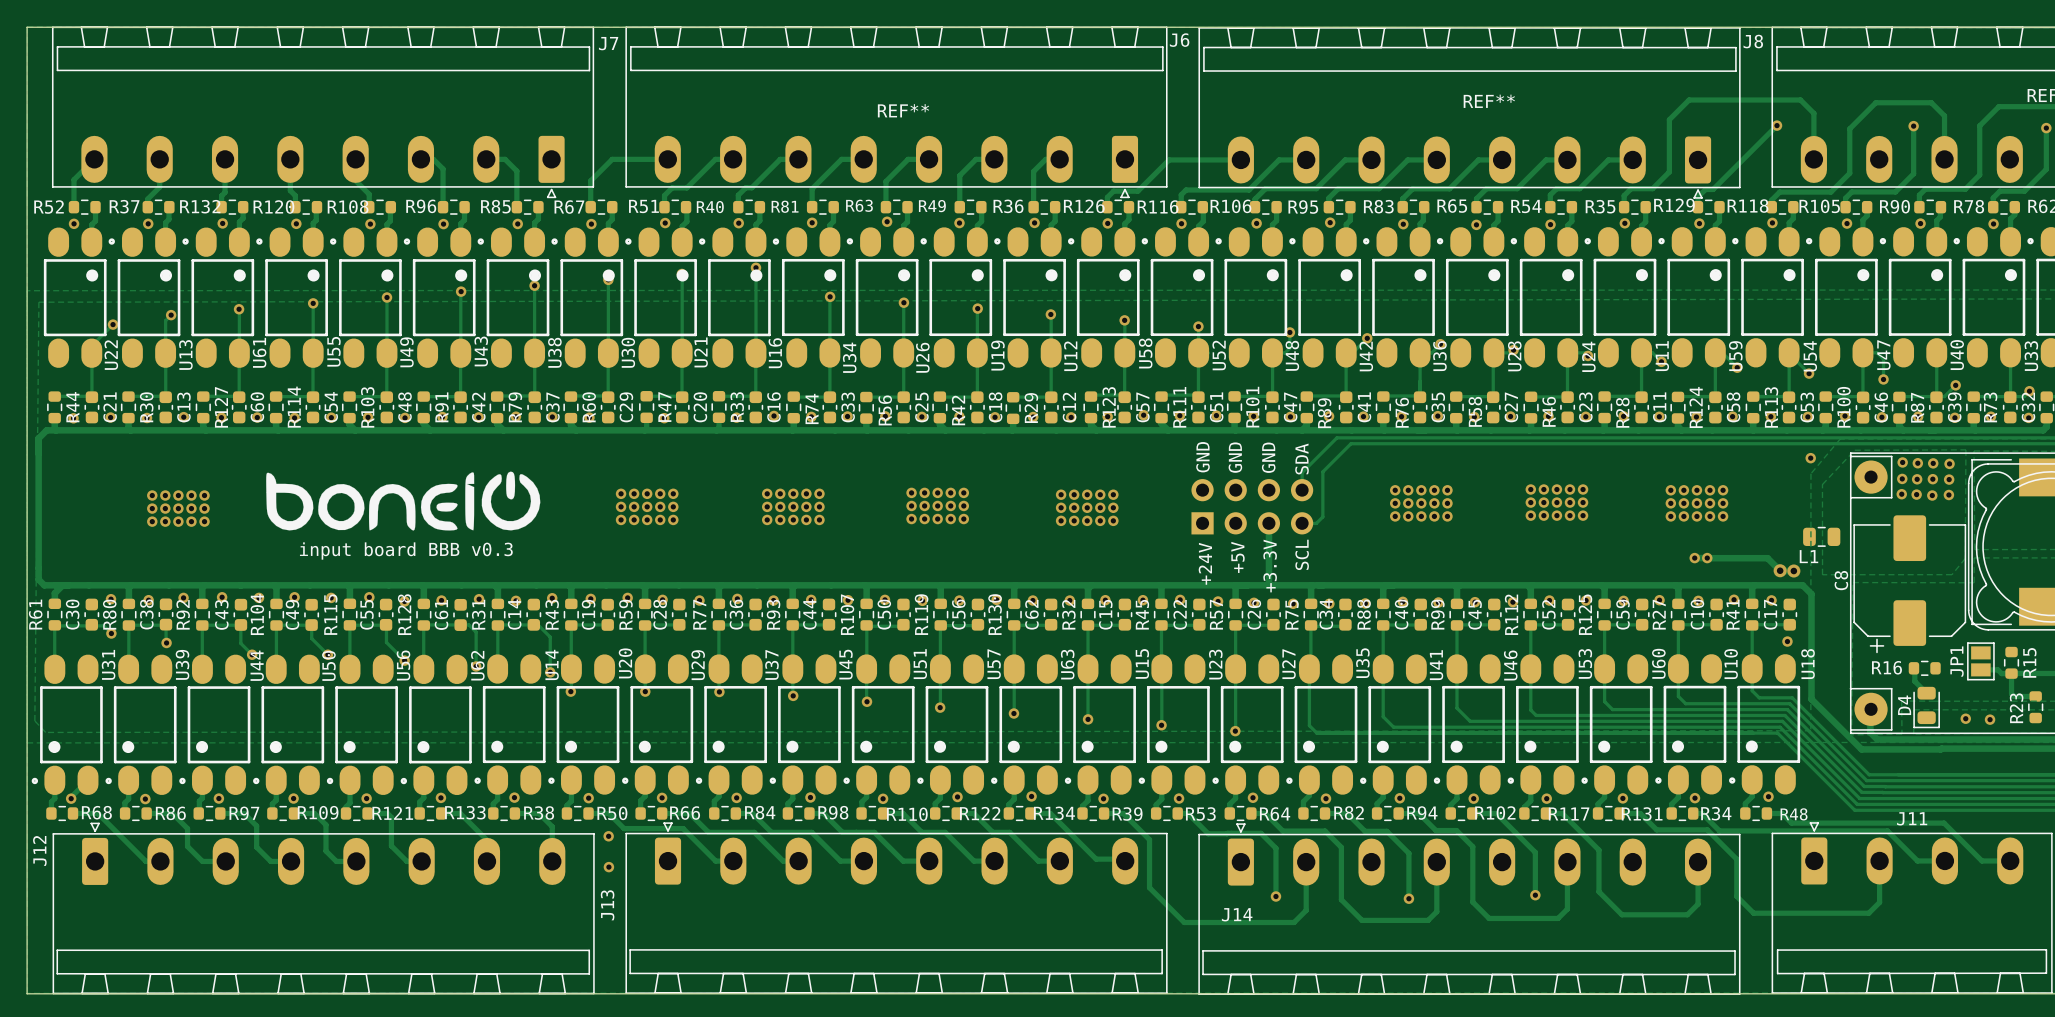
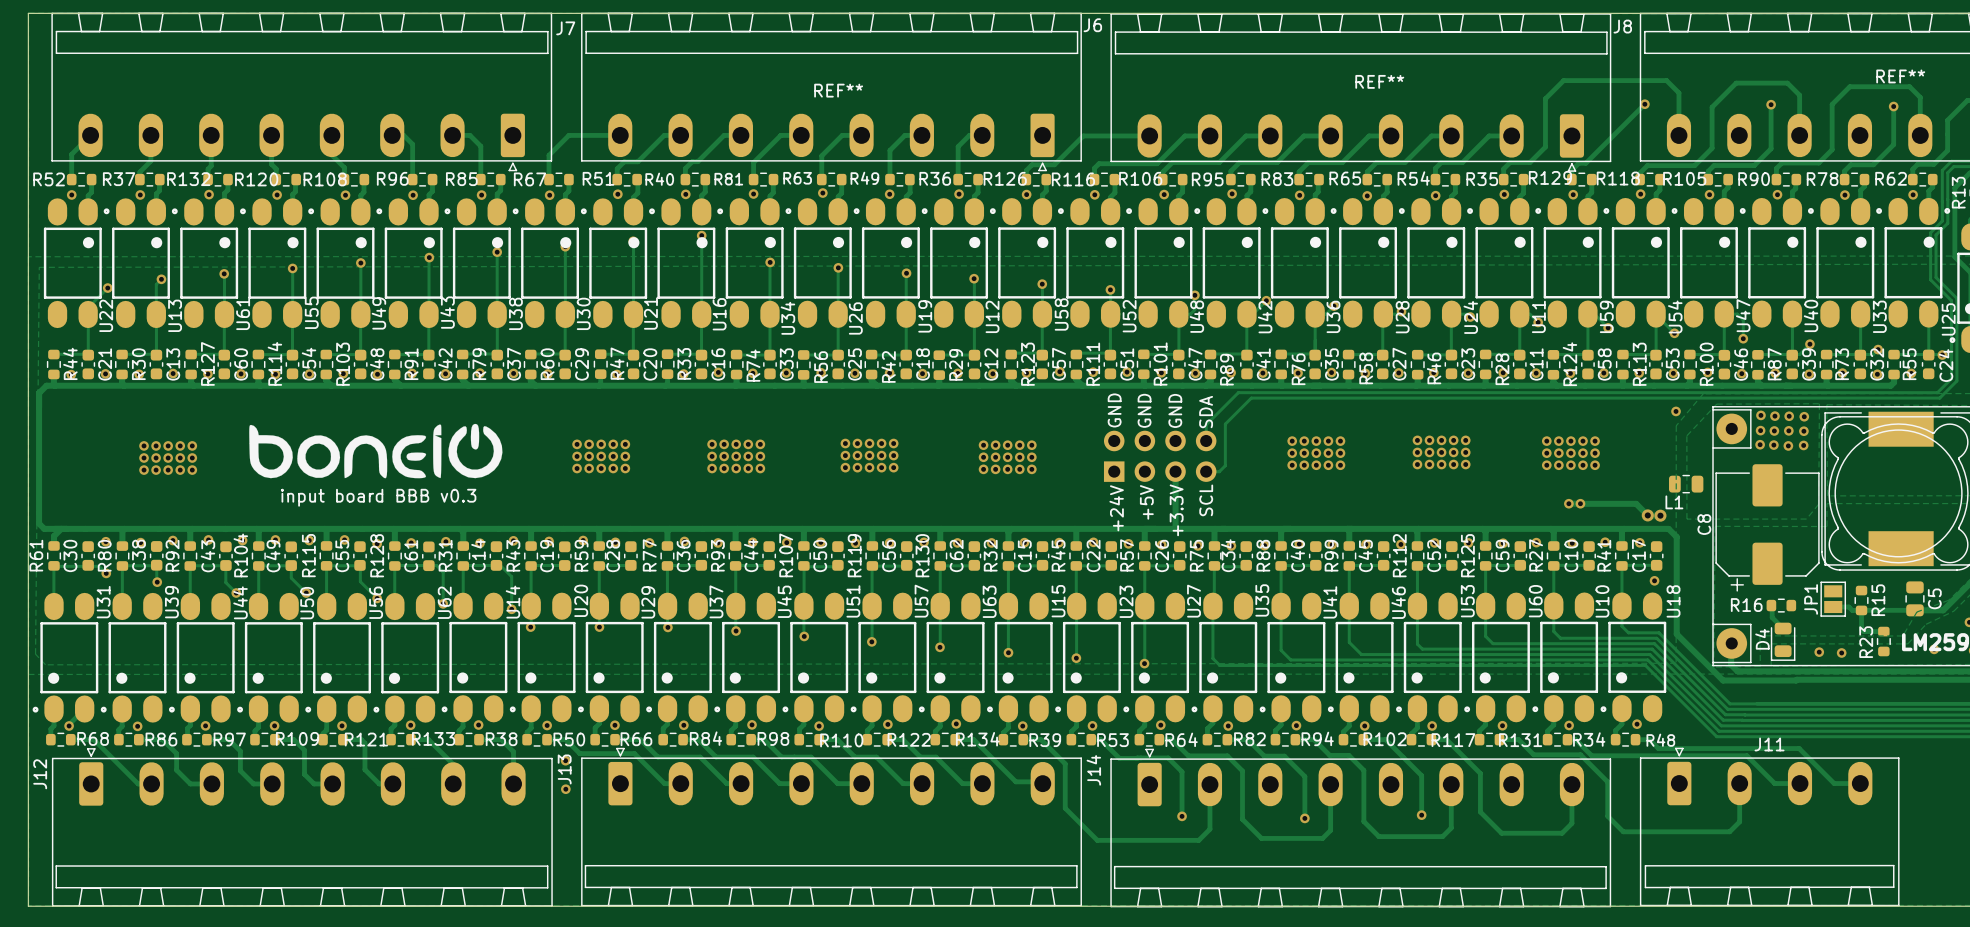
J13 name position: J13 (607, 905) -> J13 (564, 769)
J14 name rotation: 0° (1237, 914) -> 90° counterclockwise (1093, 770)
J14 name position: J14 (1237, 914) -> J14 (1093, 770)

